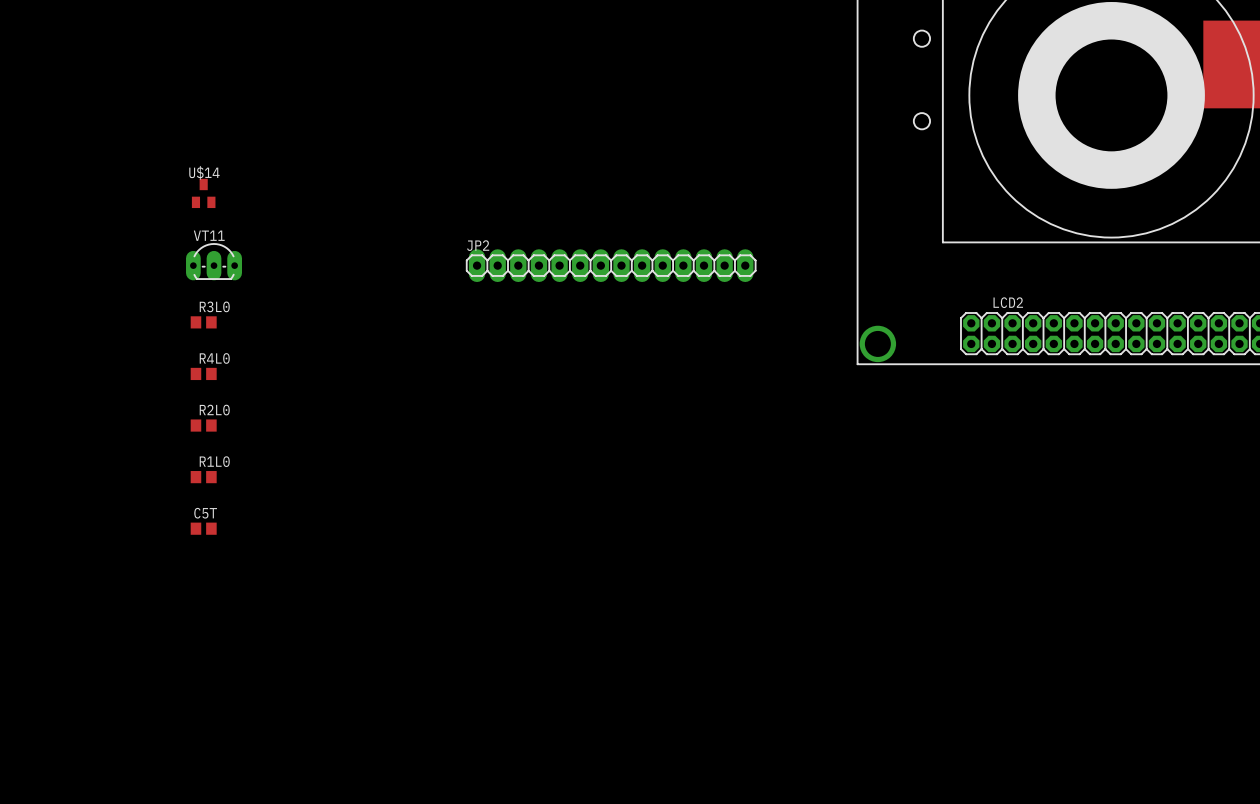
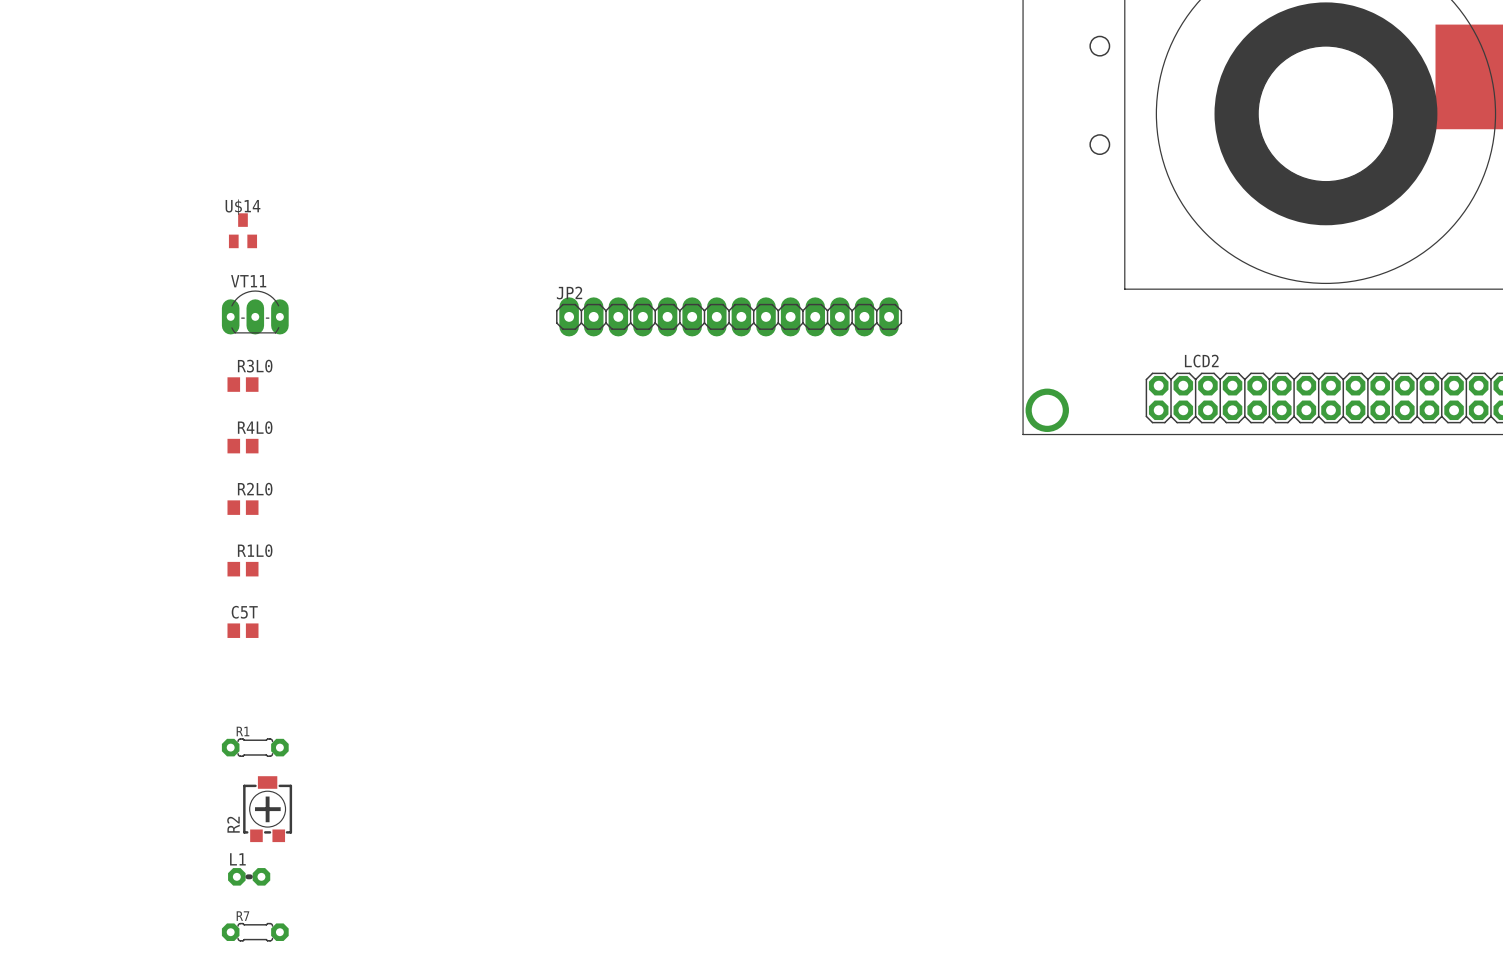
R1: none -> (255, 747)
R2: none -> (267, 809)
L1: none -> (249, 876)
R7: none -> (255, 932)

